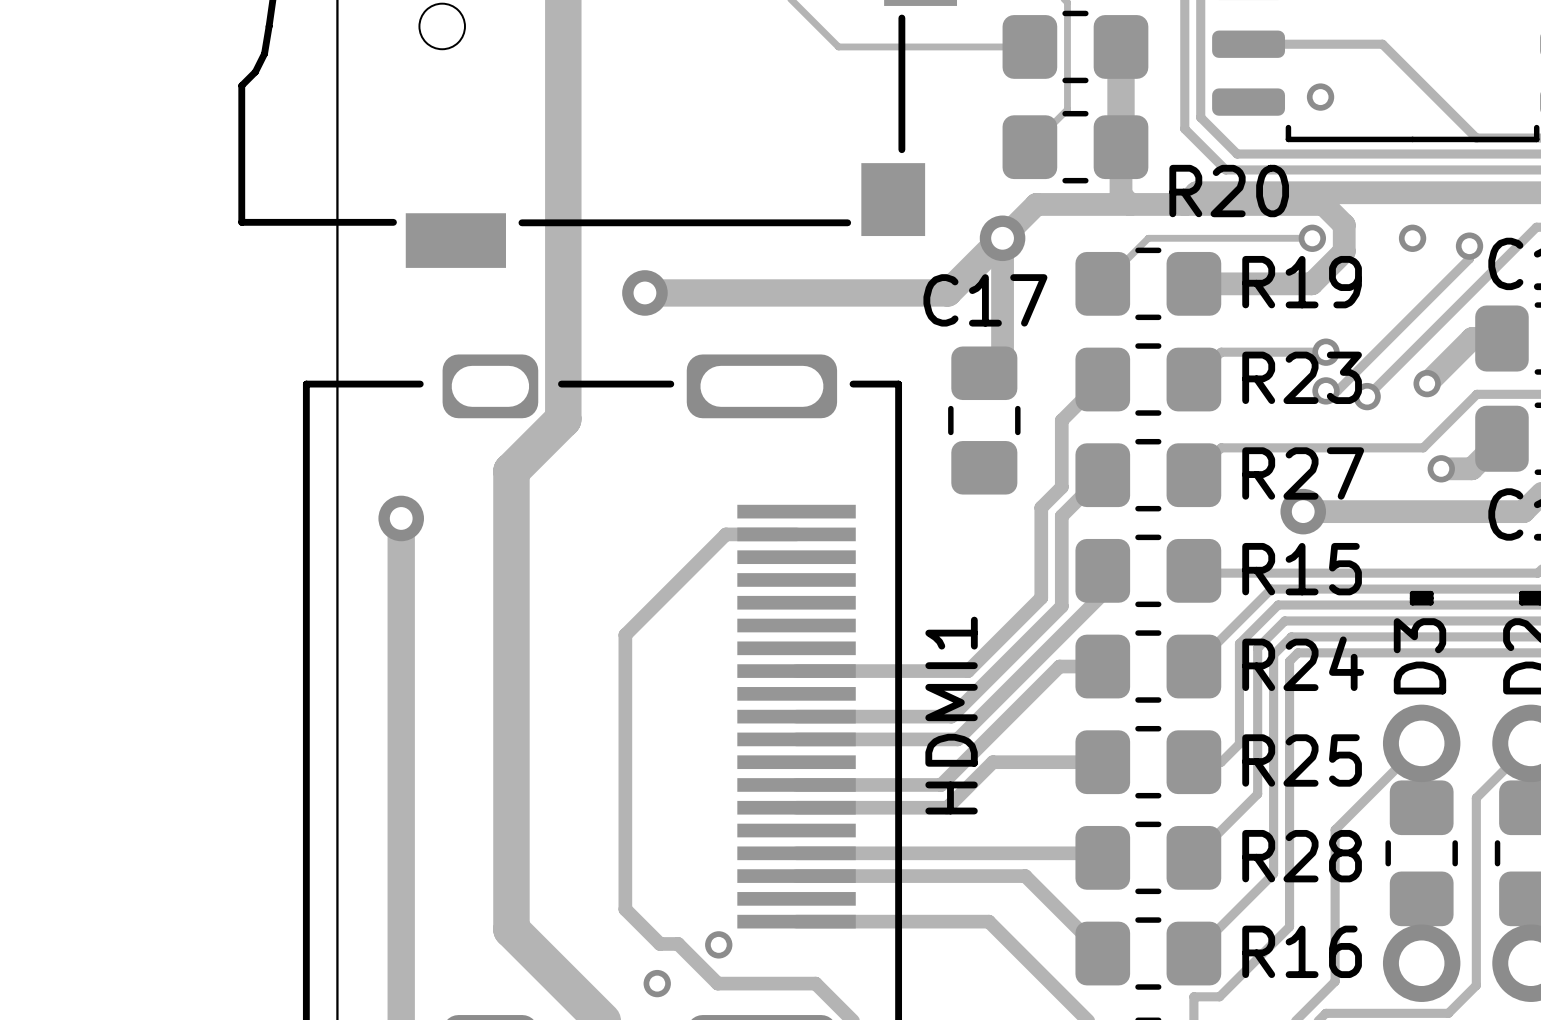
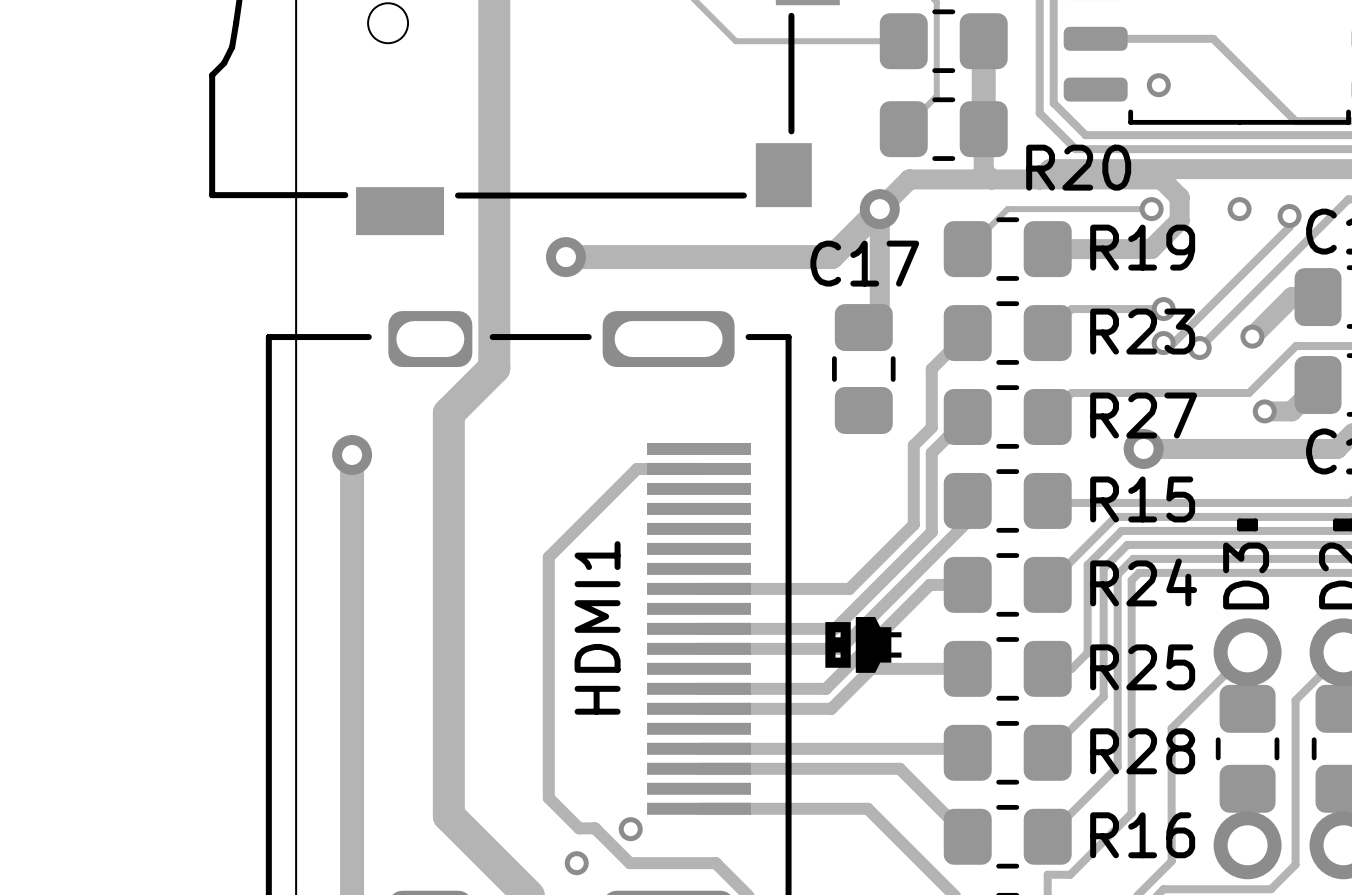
drawing: none -> [825, 617, 902, 673]
HDMI1 name position: HDMI1 (951, 715) -> HDMI1 (597, 627)

